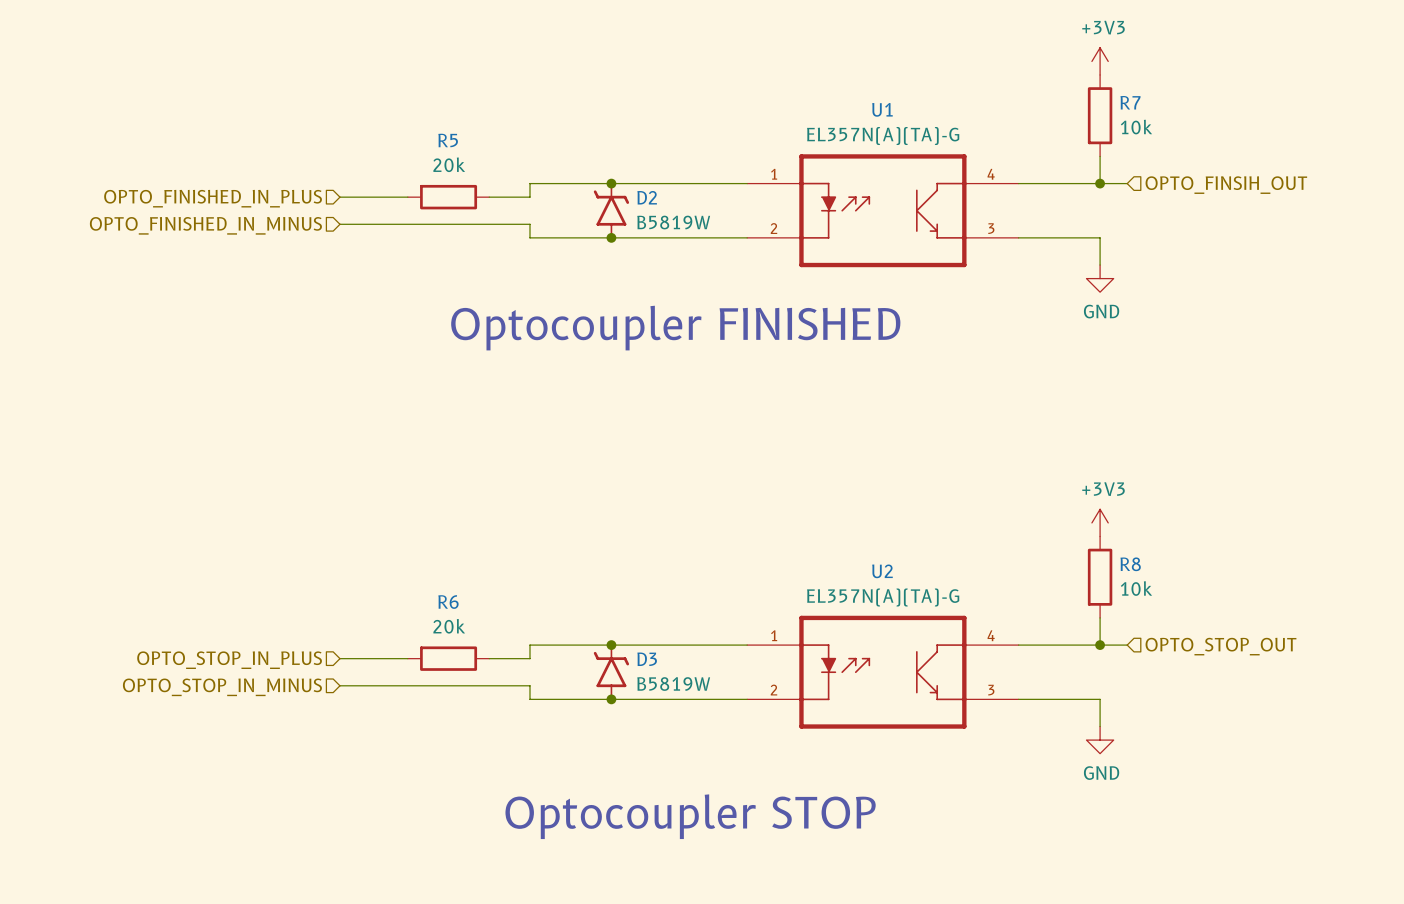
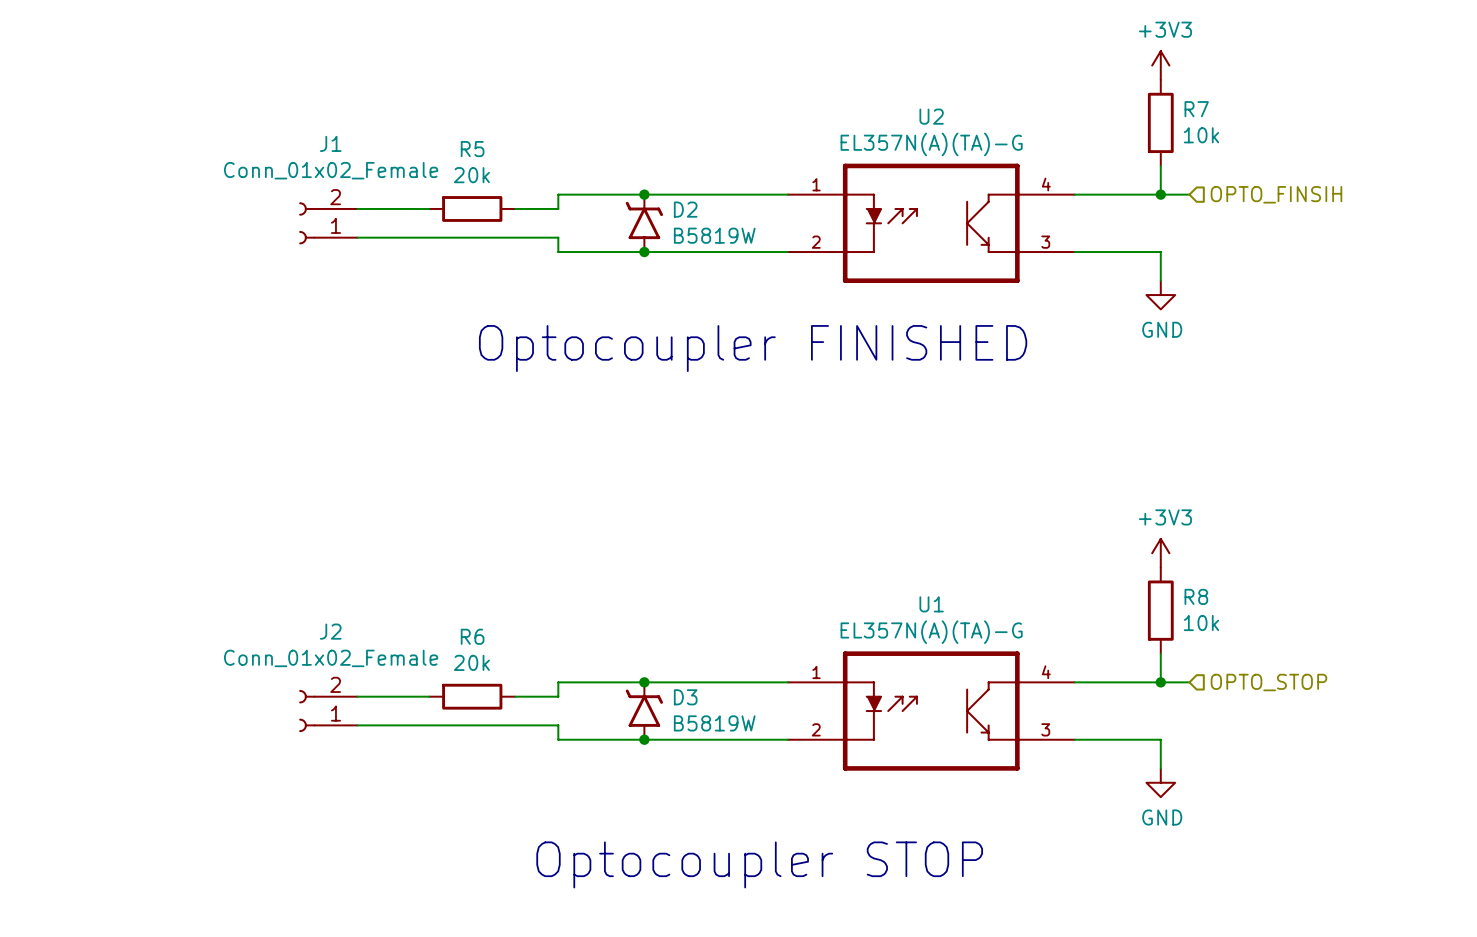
U1 name: U1 (882, 109) -> U2 (931, 116)
hierarchical label: OPTO_FINSIH_OUT (1226, 185) -> OPTO_FINSIH (1276, 194)
hierarchical label: OPTO_FINISHED_IN_PLUS (213, 198) -> none
J1: none -> Conn_01x02_Female (328, 223)
hierarchical label: OPTO_FINISHED_IN_MINUS (205, 225) -> none
U2 name: U2 (882, 571) -> U1 (931, 604)
hierarchical label: OPTO_STOP_OUT (1220, 646) -> OPTO_STOP (1268, 682)
hierarchical label: OPTO_STOP_IN_PLUS (229, 660) -> none
J2: none -> Conn_01x02_Female (328, 711)
hierarchical label: OPTO_STOP_IN_MINUS (222, 687) -> none

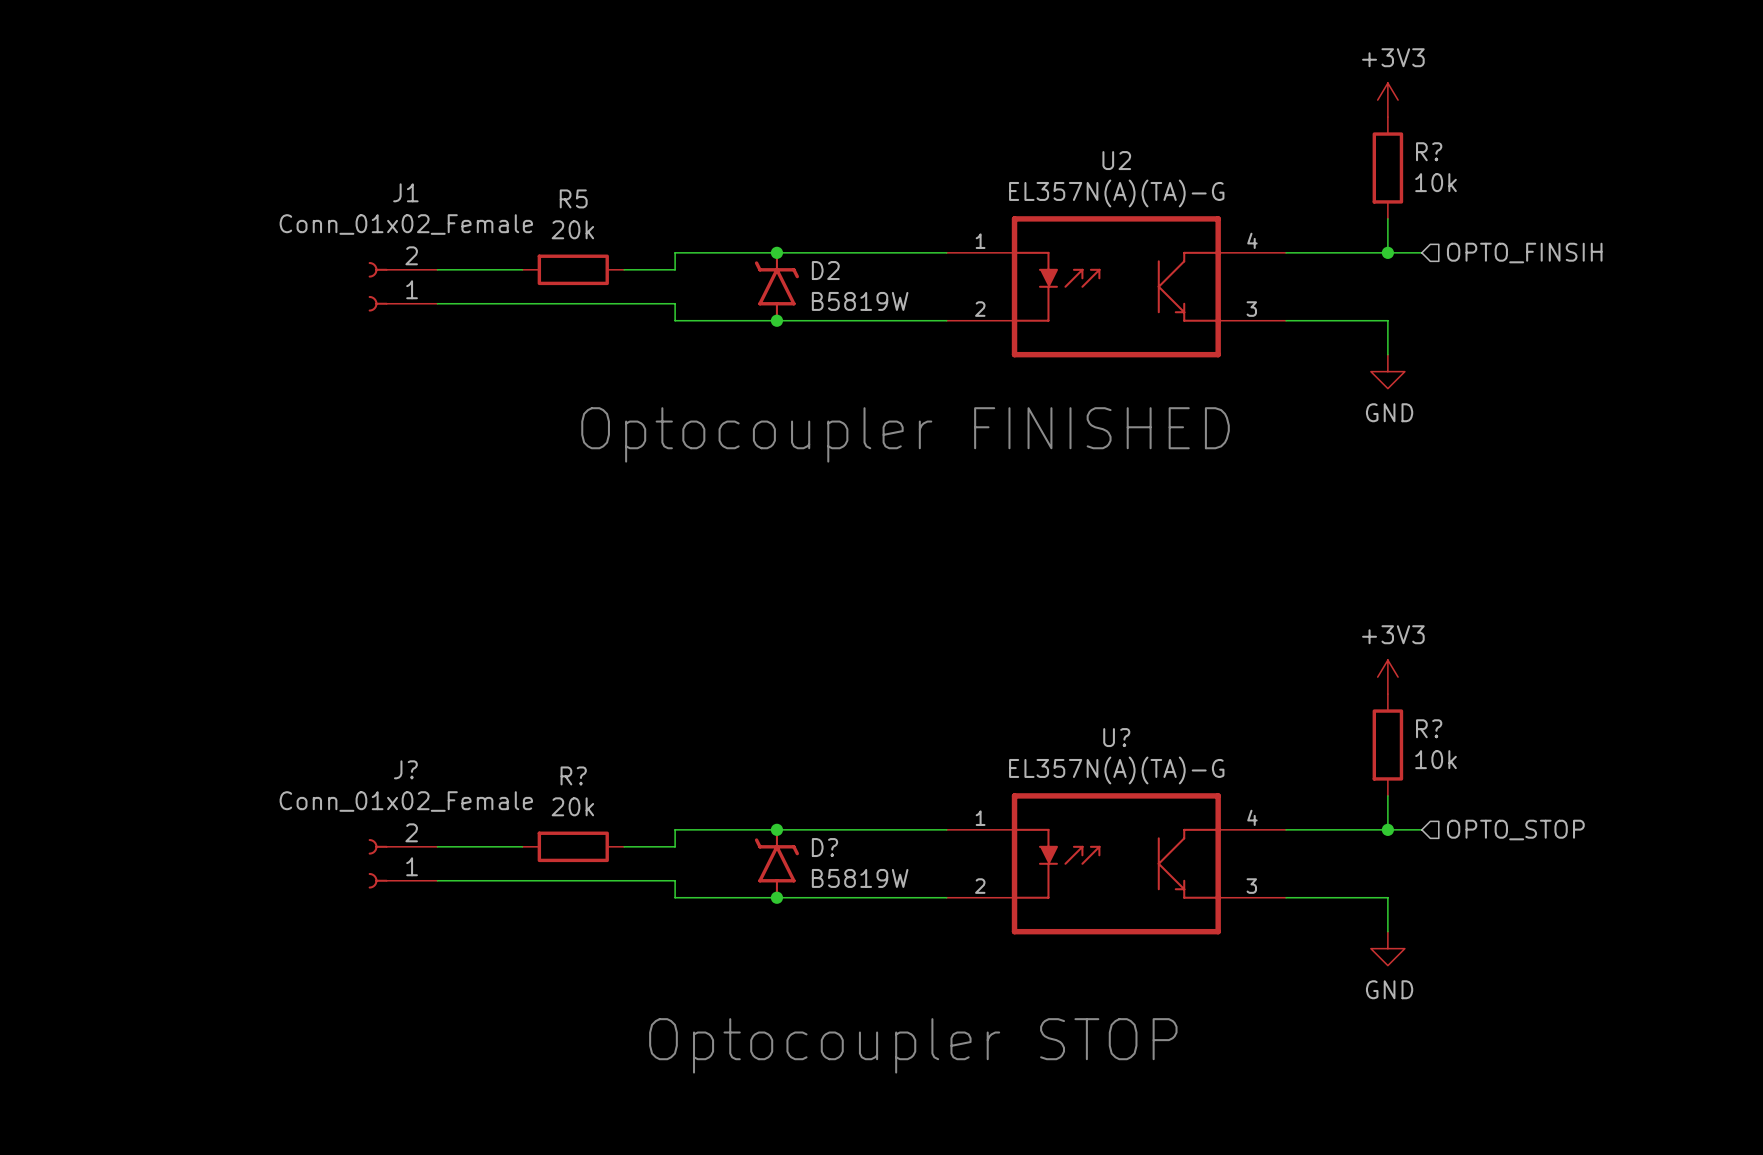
R7 name: R7 (1196, 109) -> R? (1429, 151)
R8 name: R8 (1196, 596) -> R? (1429, 728)
U1 name: U1 (931, 604) -> U? (1116, 737)
J2 name: J2 (330, 631) -> J? (405, 769)
R6 name: R6 (472, 636) -> R? (573, 775)
D3 name: D3 (685, 697) -> D? (824, 847)

